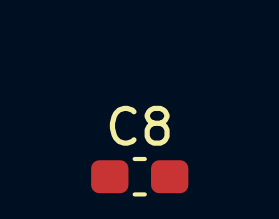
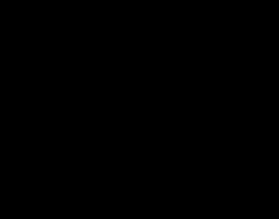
C8: (139, 176) -> none

